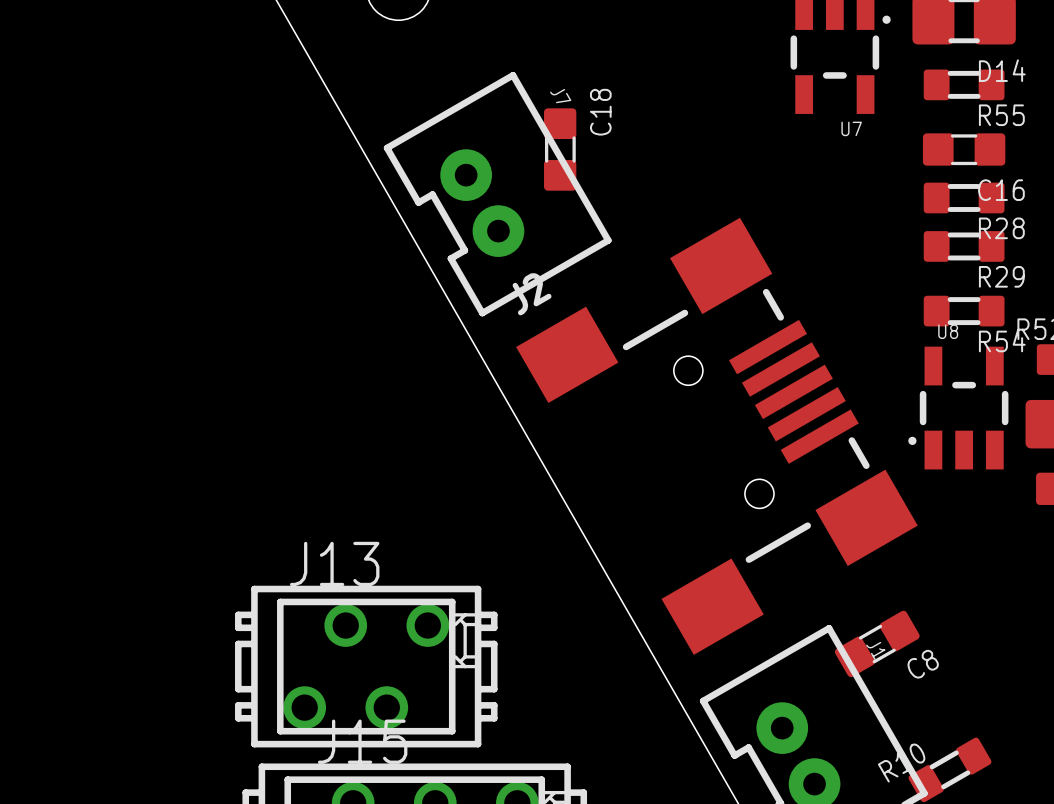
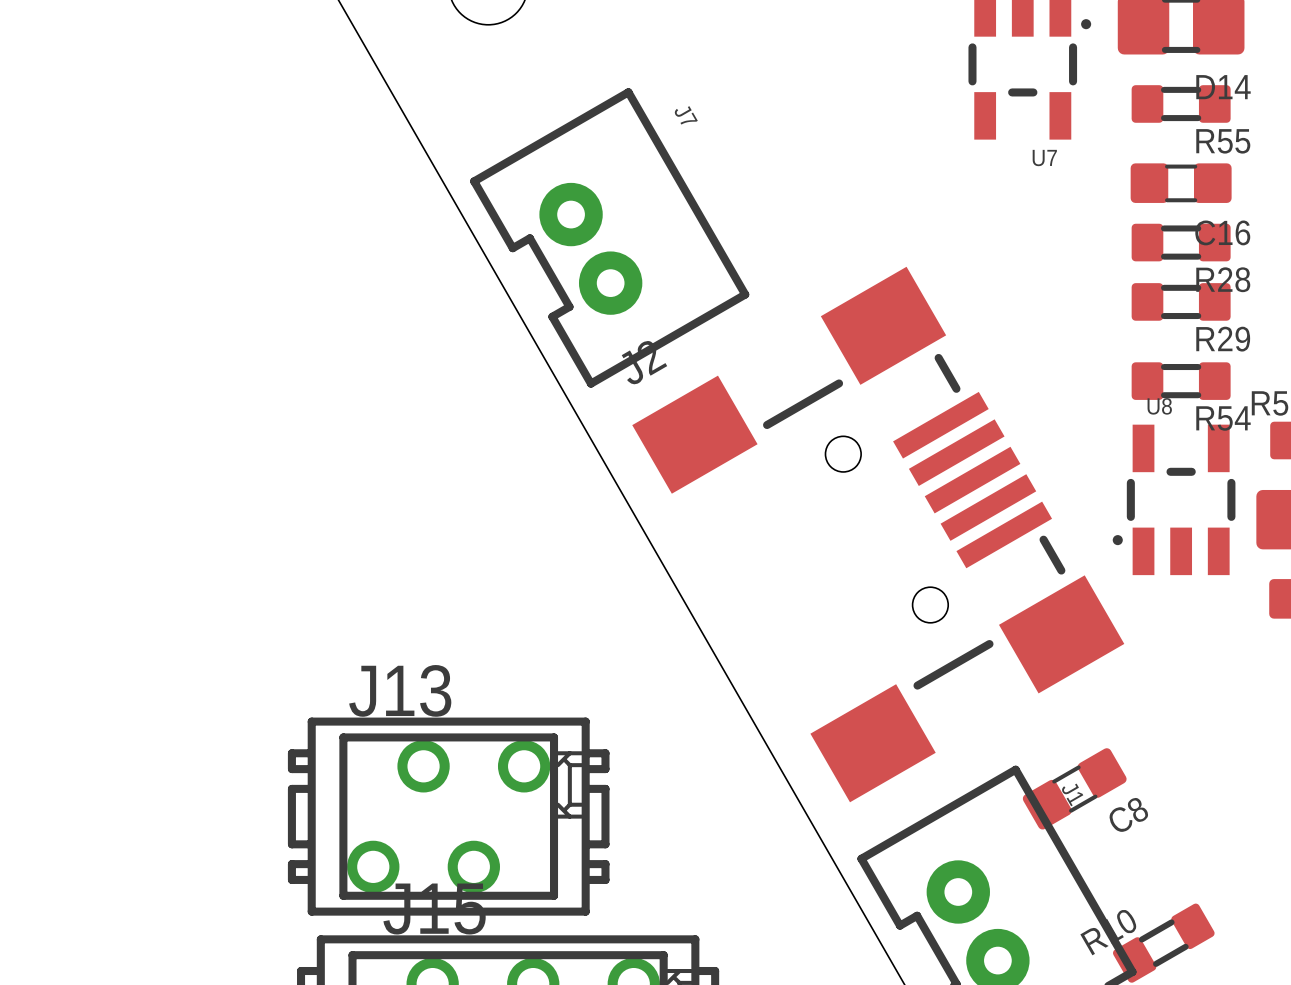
C18: (560, 149) -> none

